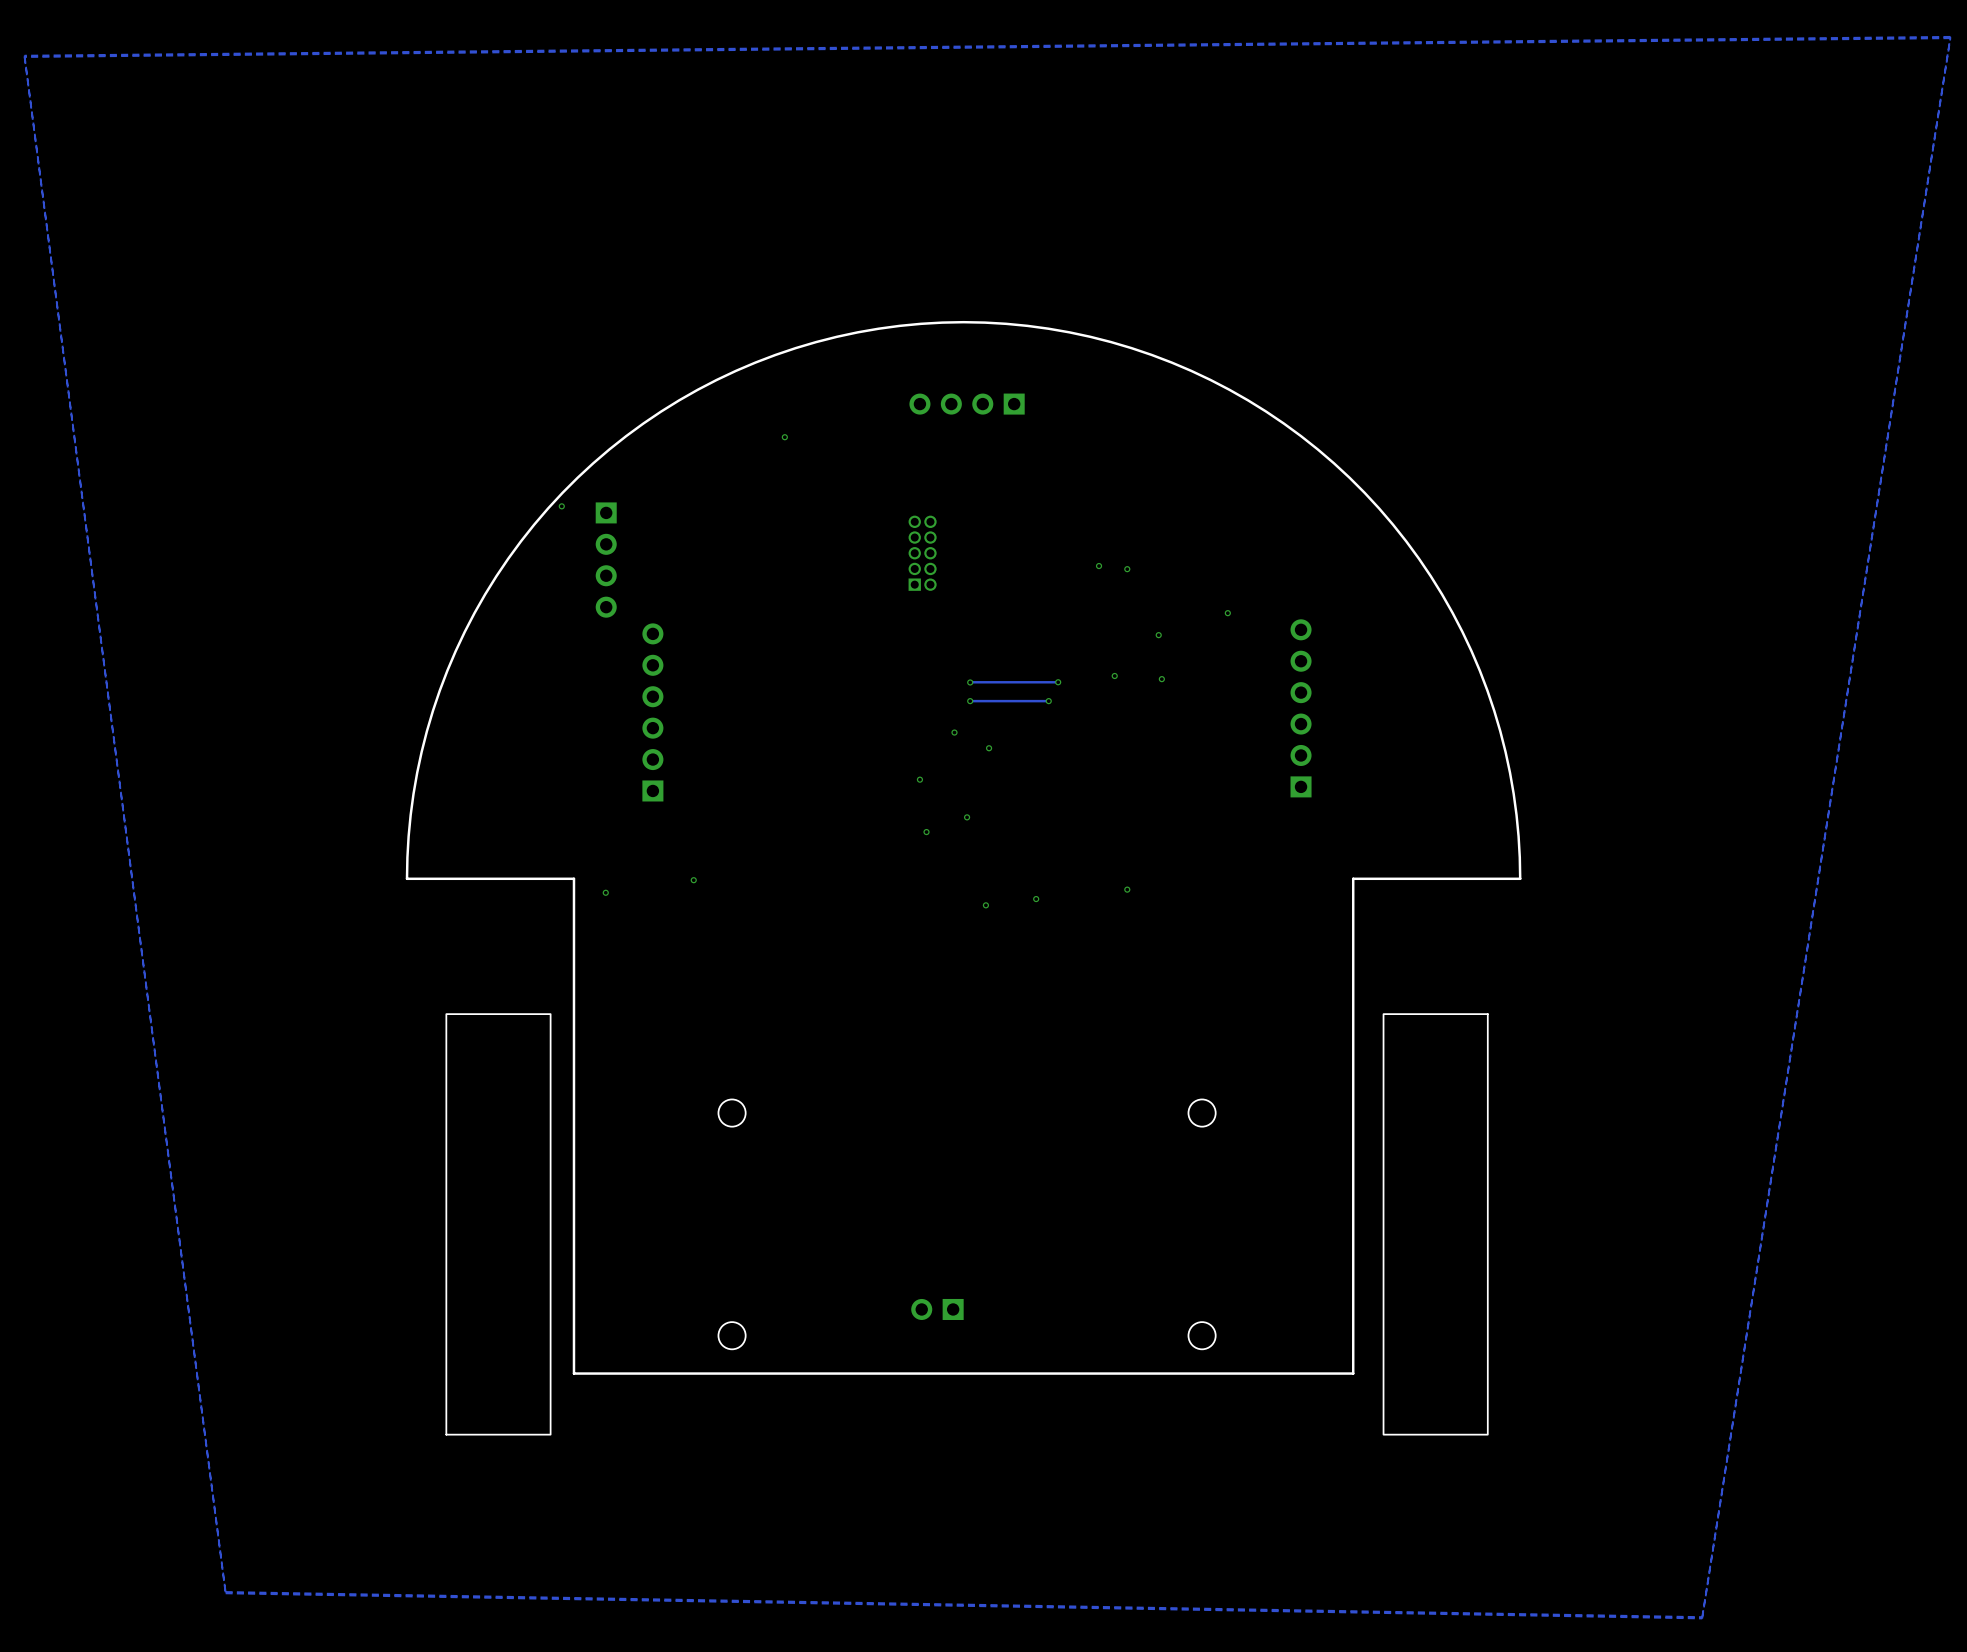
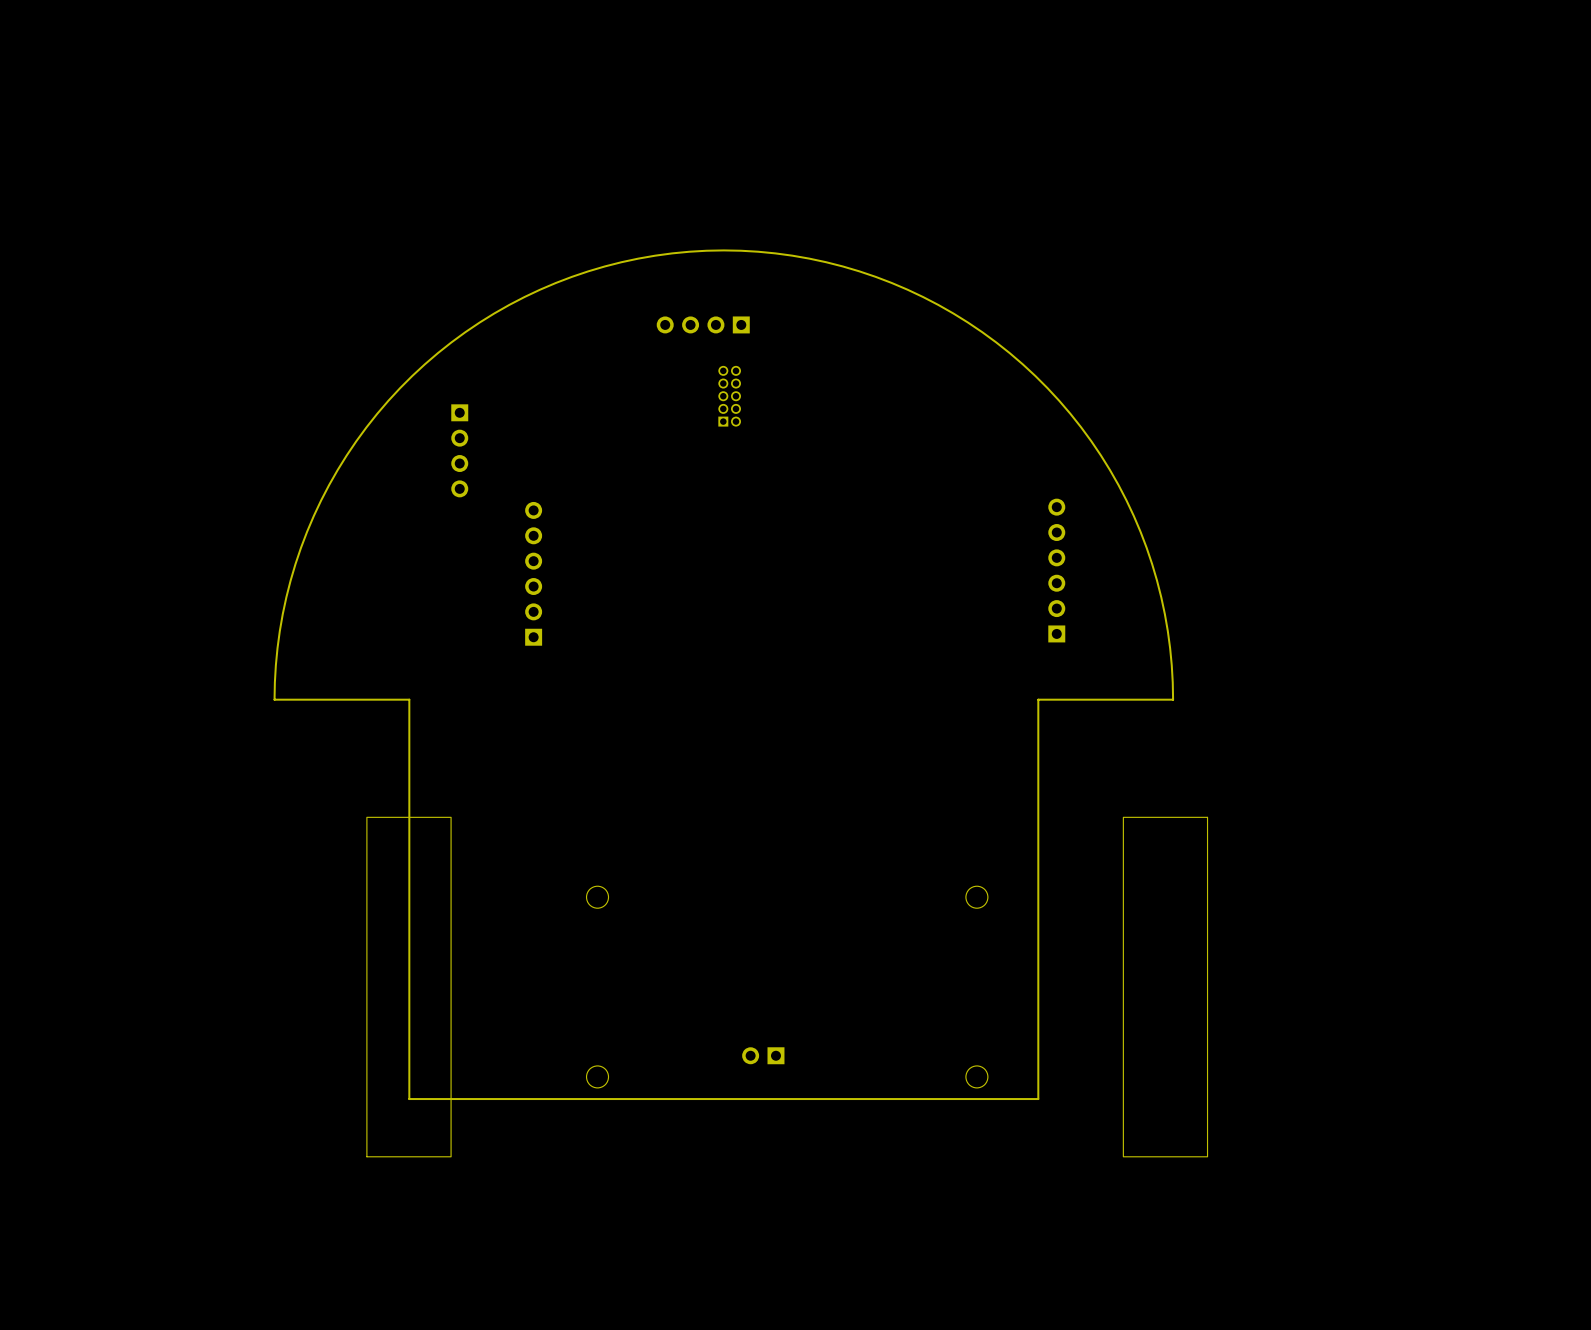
zone outline: (1950, 36) (24, 55) (225, 1591) (1702, 1617) (1950, 36) -> none
zone outline: (1950, 38) (24, 57) (225, 1593) (1702, 1618) (1950, 38) -> none
part position: (967, 404) -> (703, 324)
via: (784, 437) -> none
via: (561, 506) -> none
part position: (922, 553) -> (729, 396)
part position: (606, 560) -> (459, 450)
via: (1099, 566) -> none
via: (1127, 569) -> none
via: (1227, 613) -> none
via: (1158, 635) -> none
via: (1114, 675) -> none
via: (1161, 679) -> none
via: (970, 682) -> none
track: (1058, 682) (970, 682) -> none
via: (1058, 682) -> none
via: (970, 701) -> none
track: (1048, 701) (970, 701) -> none
via: (1048, 701) -> none
via: (954, 732) -> none
via: (989, 748) -> none
via: (919, 779) -> none
via: (967, 817) -> none
via: (926, 832) -> none
board edge: (1520, 878) (1353, 878) (1353, 1373) (573, 1373) (573, 878) (407, 878) (410, 814) (417, 772) (432, 710) (447, 670) (474, 612) (508, 558) (534, 524) (577, 477) (626, 436) (661, 411) (716, 379) (755, 362) (795, 348) (857, 332) (921, 323) (963, 322) (1027, 325) (1069, 332) (1111, 342) (1171, 362) (1229, 389) (1266, 411) (1317, 449) (1364, 492) (1406, 541) (1430, 576) (1452, 612) (1479, 670) (1500, 731) (1510, 772) (1518, 836) (1520, 878) -> (1173, 699) (1038, 699) (1038, 1099) (409, 1099) (409, 699) (274, 699) (277, 648) (286, 597) (295, 564) (313, 515) (337, 470) (356, 441) (377, 413) (412, 375) (437, 353) (479, 322) (524, 297) (555, 282) (588, 271) (638, 258) (672, 253) (723, 250) (775, 253) (809, 258) (842, 266) (891, 282) (923, 297) (968, 322) (996, 342) (1035, 375) (1070, 413) (1091, 441) (1118, 485) (1140, 531) (1152, 564) (1164, 614) (1170, 648) (1173, 699)
via: (693, 880) -> none
via: (1127, 889) -> none
via: (605, 892) -> none
via: (1036, 899) -> none
via: (985, 905) -> none

